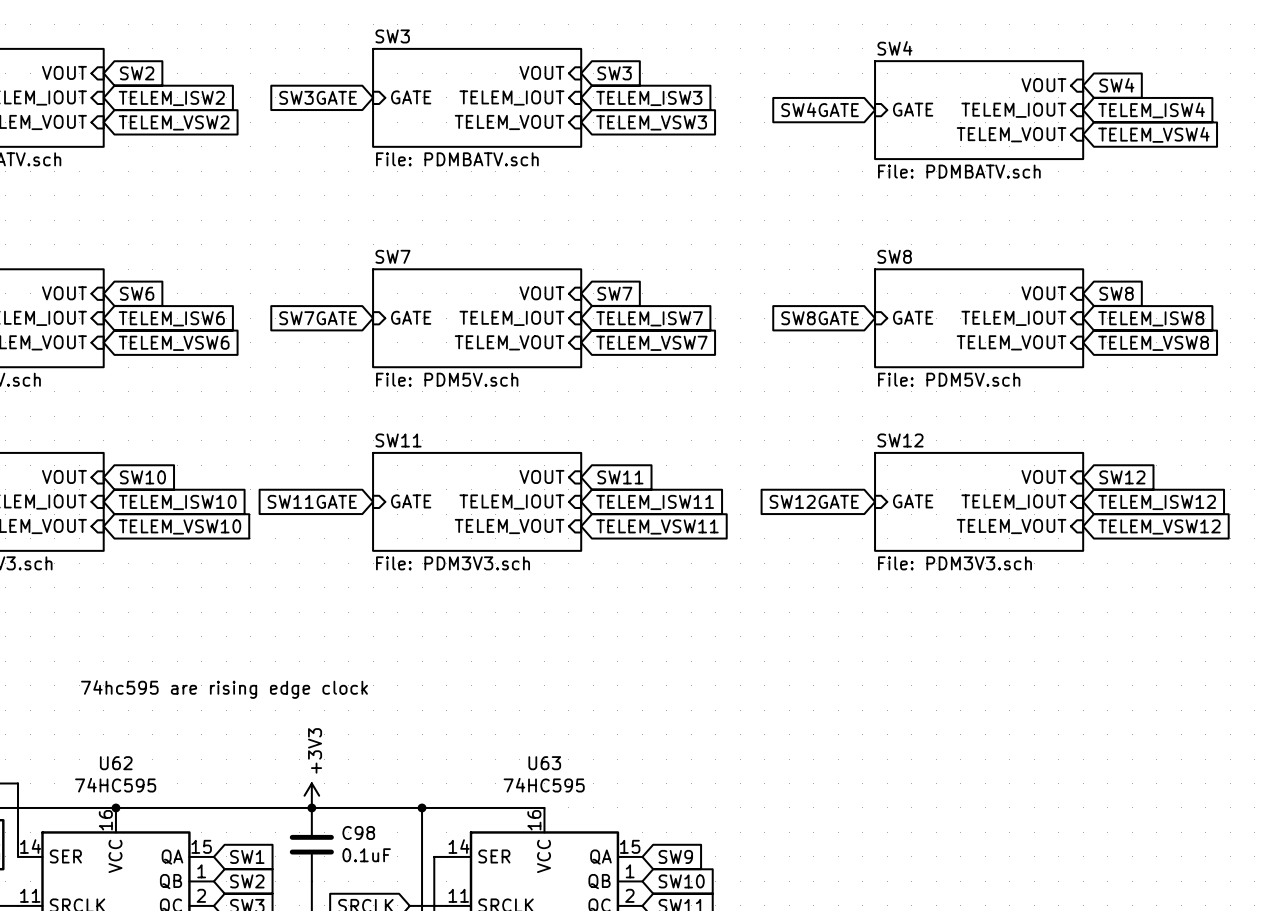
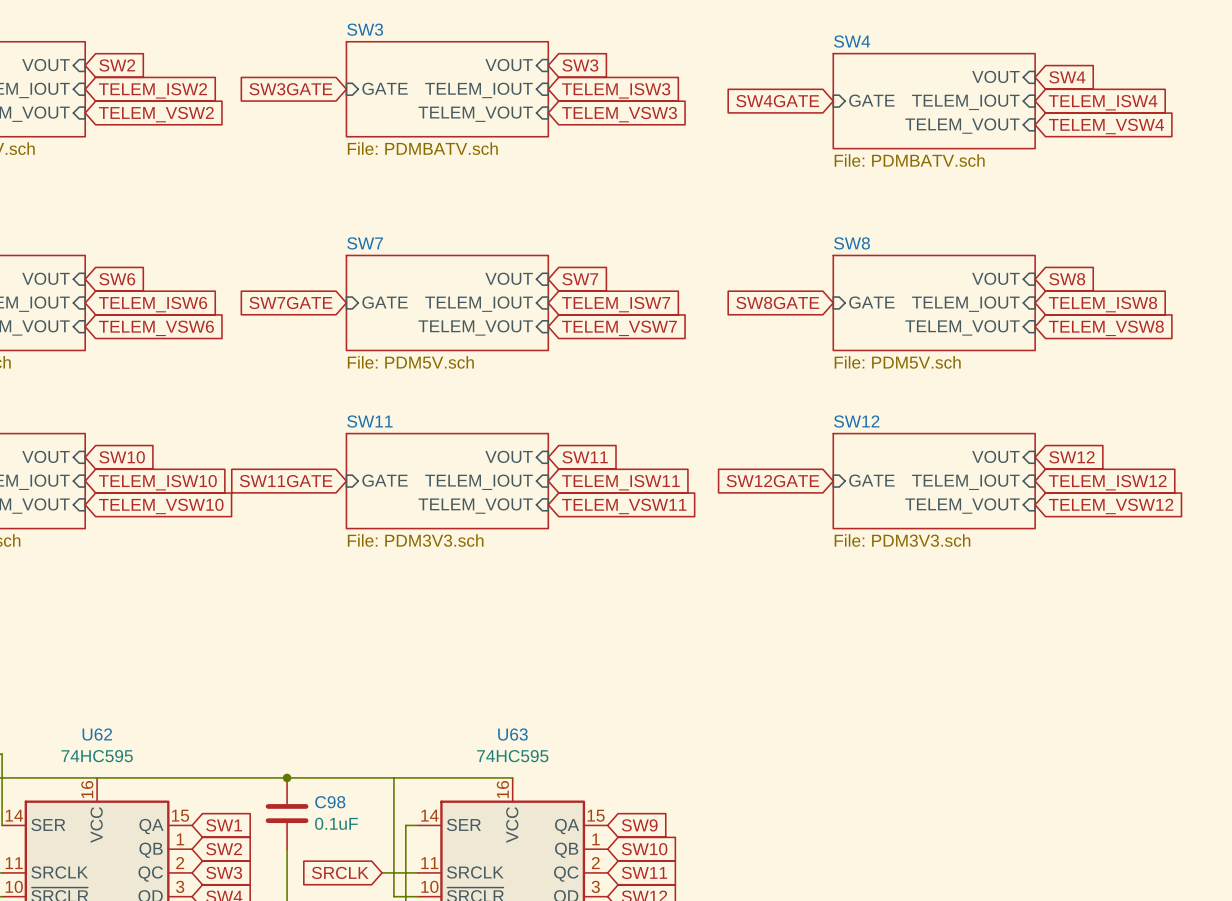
text: 74hc595 are rising edge clock (224, 689) -> none
power symbol: +3V3 (311, 795) -> none
junction: (115, 807) -> none
junction: (422, 807) -> none

